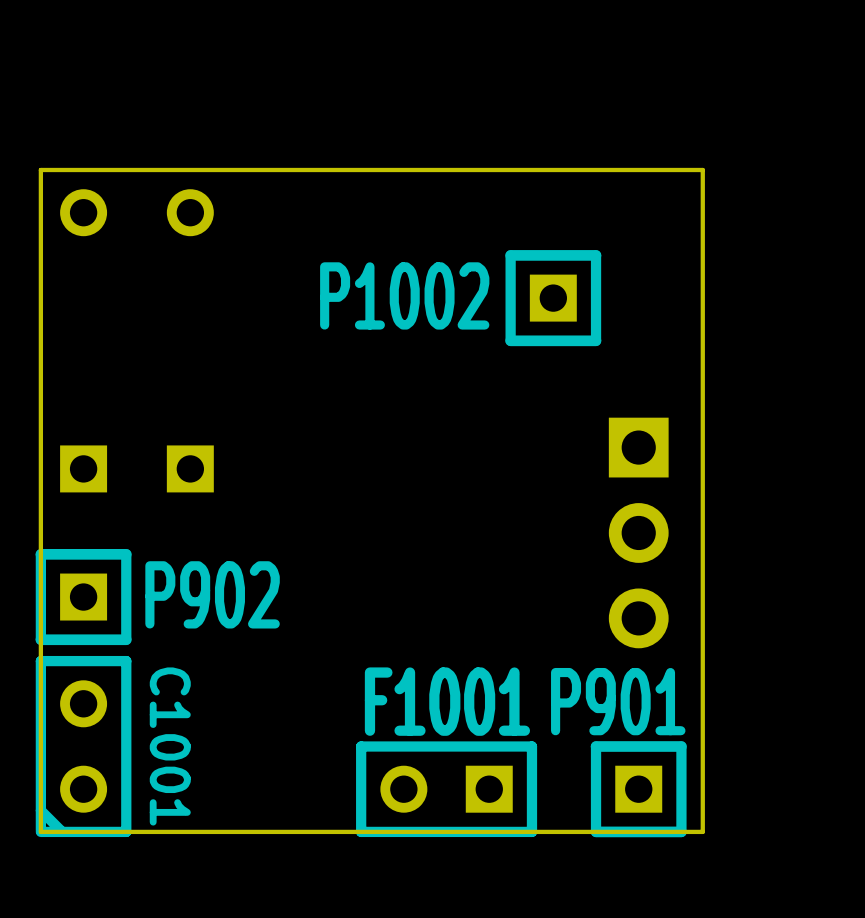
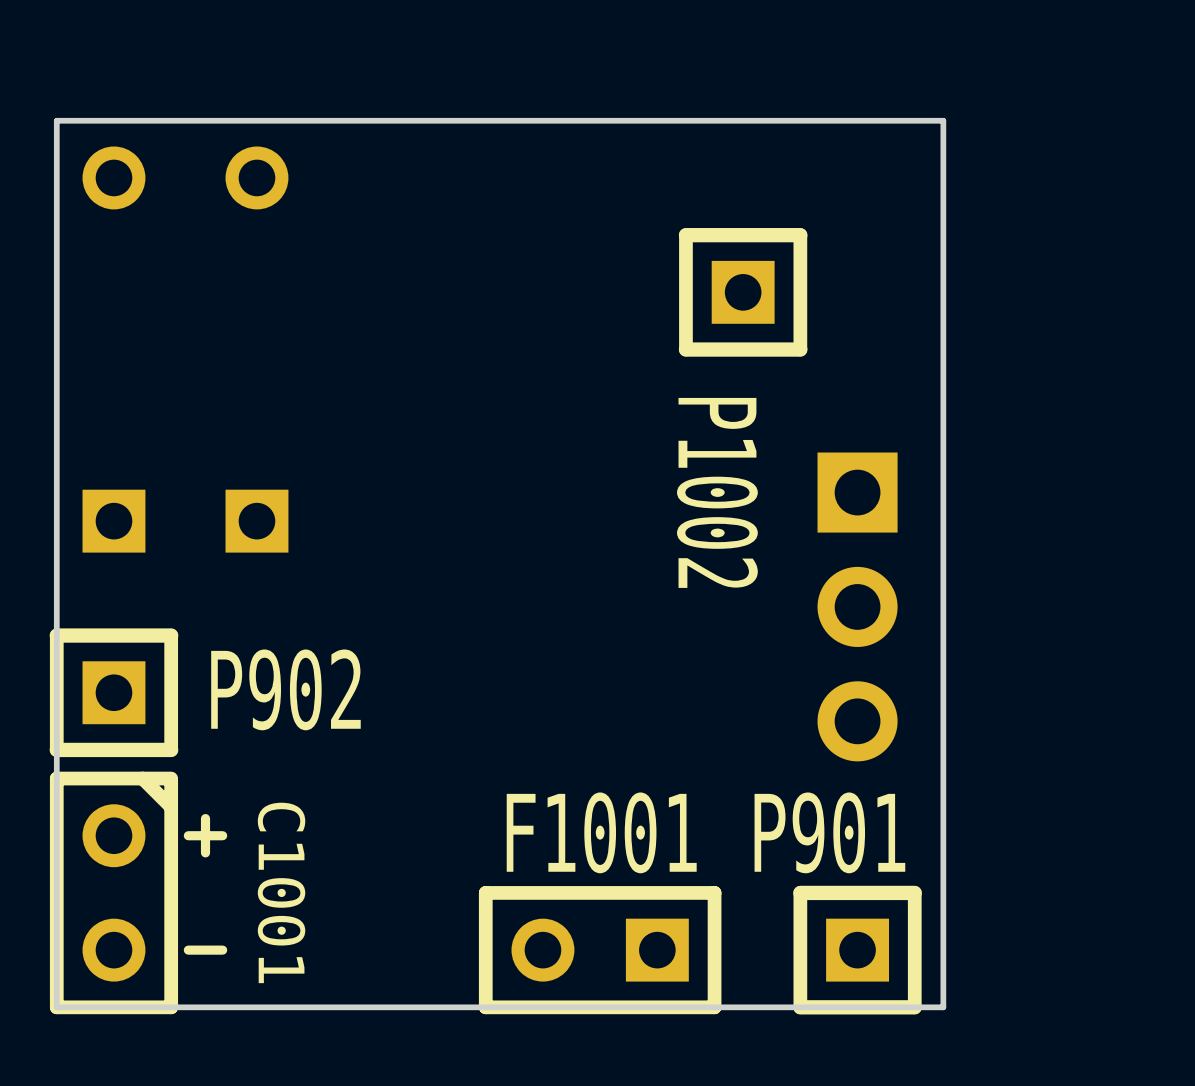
P1002 name rotation: 0° (404, 295) -> 90° clockwise (717, 492)
line: none -> (205, 818) (205, 852)
line: none -> (222, 835) (188, 835)
C1001 rotation: 0° (83, 746) -> 180° (113, 892)
line: none -> (222, 950) (188, 950)

